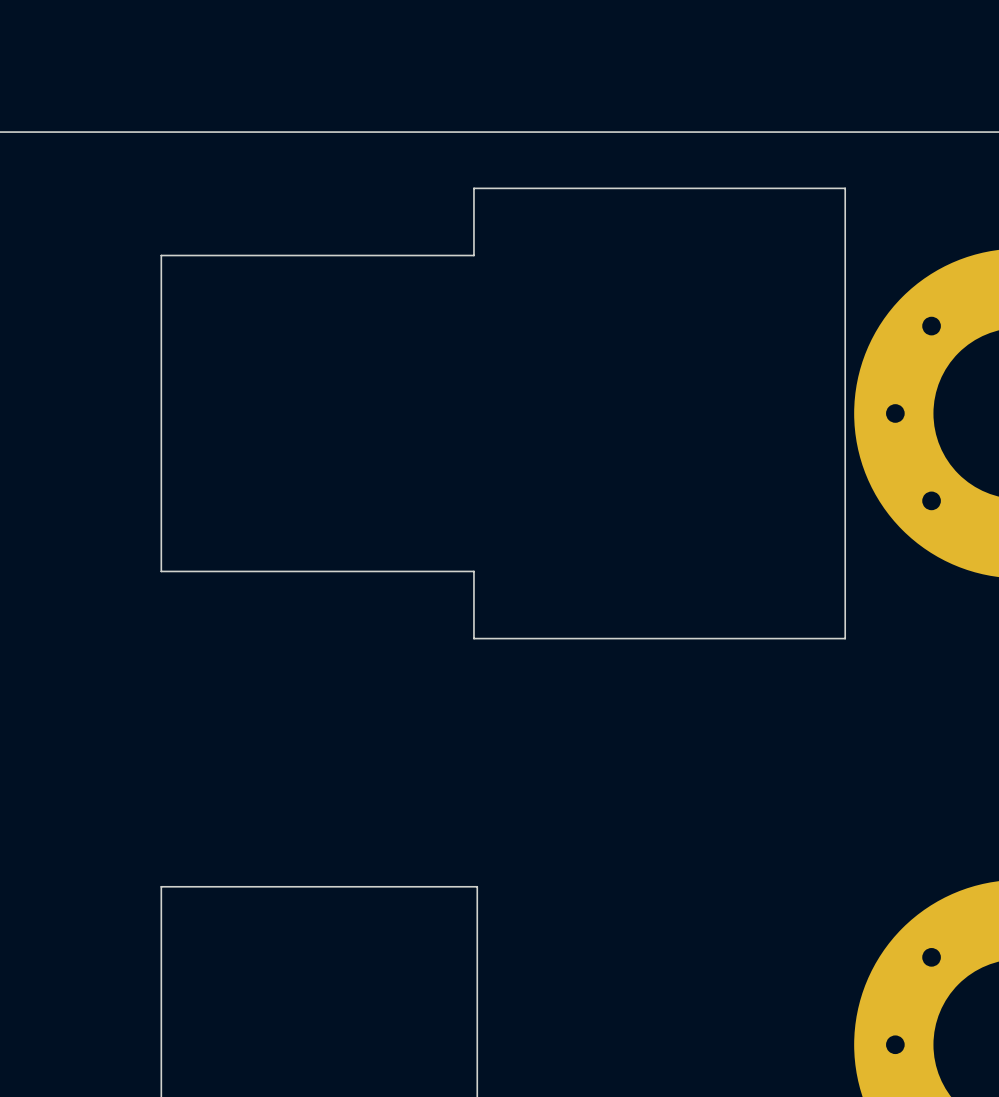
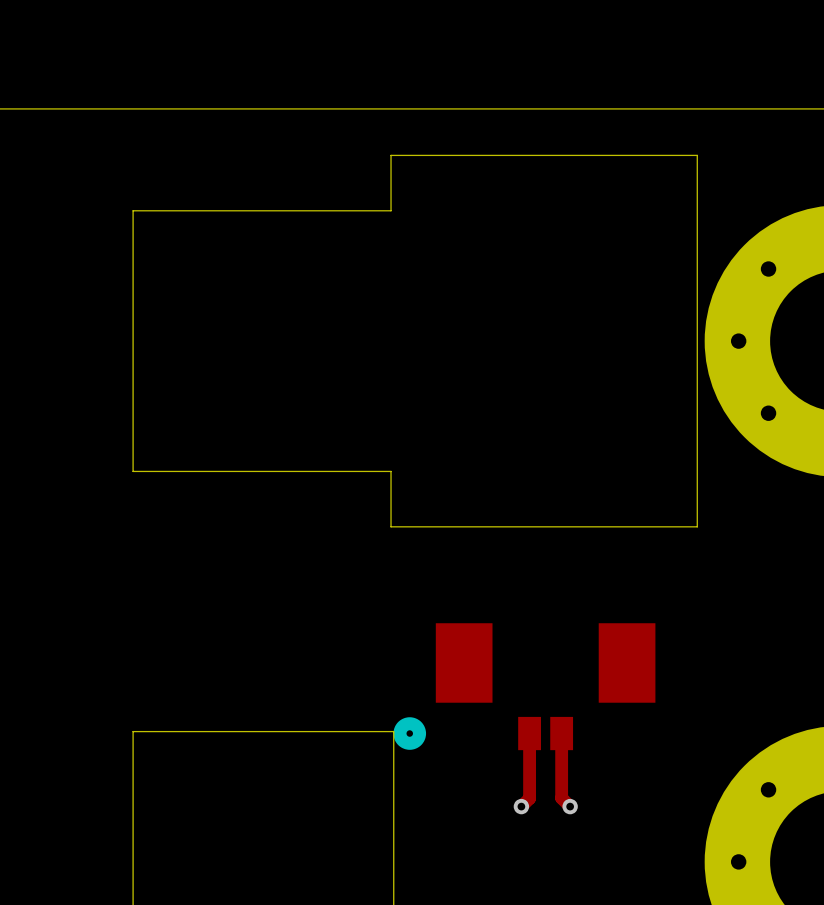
part: none -> (524, 686)
top track: none -> (529, 733) (529, 798) (521, 806)
top track: none -> (561, 733) (561, 798) (570, 806)
via: none -> (521, 806)
via: none -> (570, 806)

